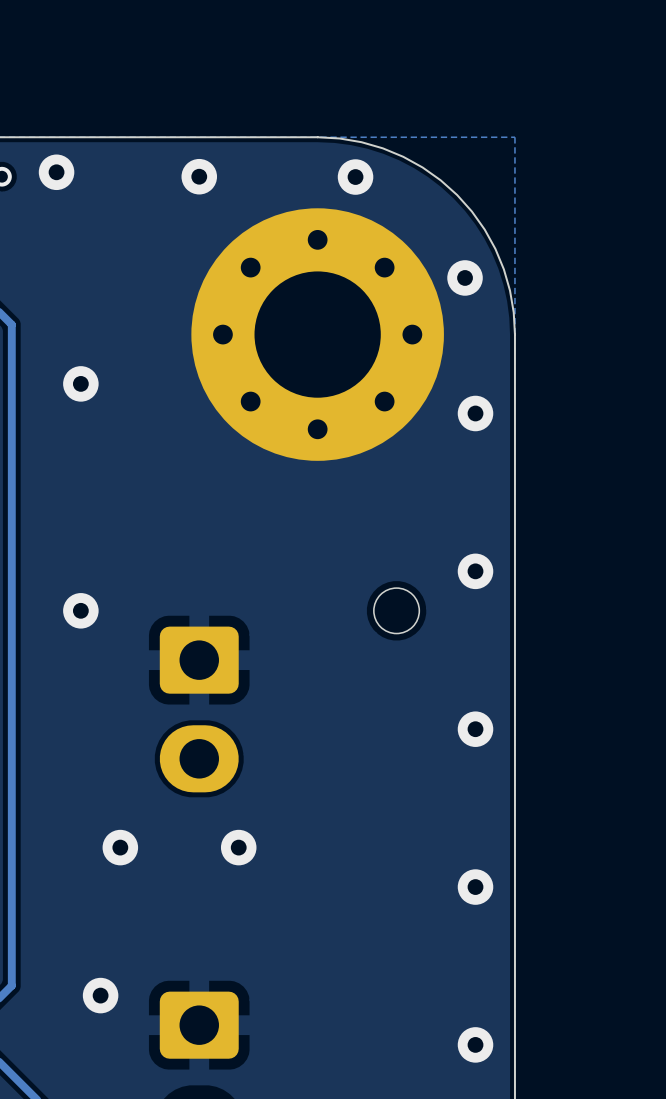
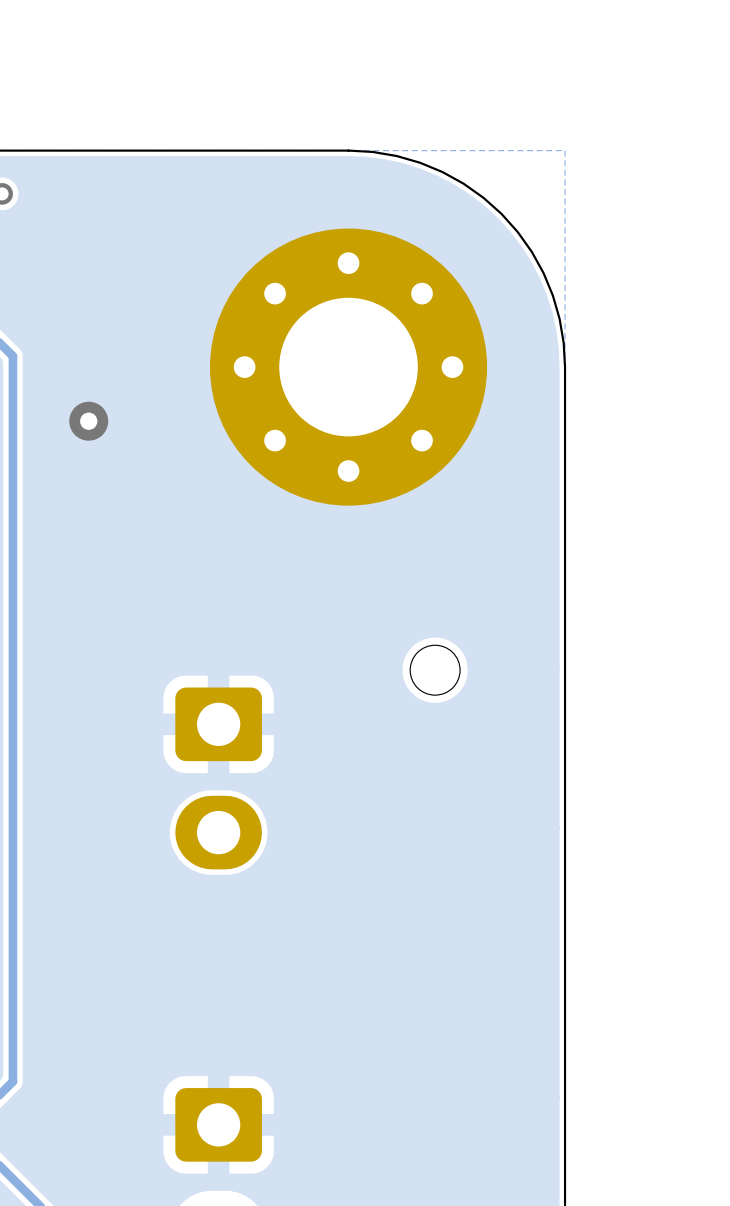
via: (56, 172) -> none
via: (199, 176) -> none
via: (355, 177) -> none
via: (465, 277) -> none
via: (475, 413) -> none
via: (475, 571) -> none
via: (80, 610) -> none
via: (475, 729) -> none
via: (120, 847) -> none
via: (238, 847) -> none
via: (475, 887) -> none
via: (100, 995) -> none
via: (475, 1044) -> none

